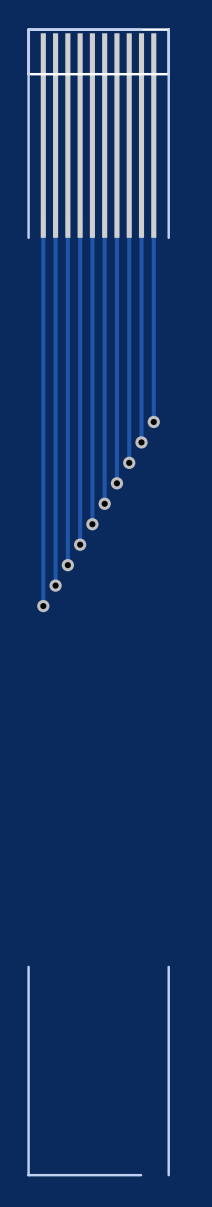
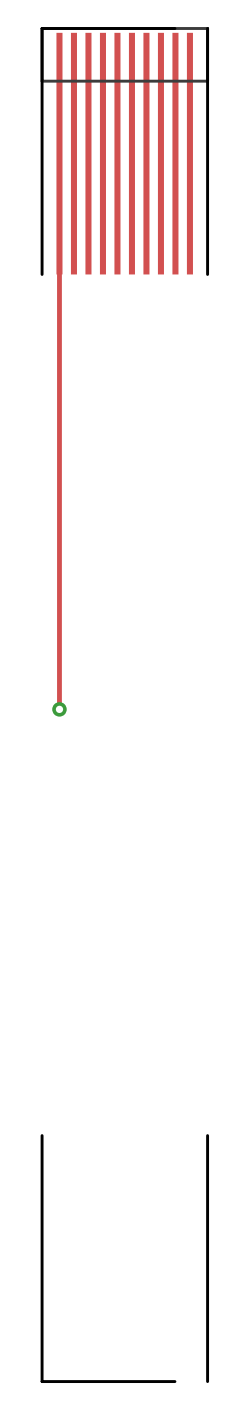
track: (55, 217) (55, 585) -> none
track: (67, 217) (67, 565) -> none
track: (80, 217) (80, 544) -> none
track: (92, 217) (92, 524) -> none
track: (104, 217) (104, 503) -> none
track: (116, 217) (116, 483) -> none
track: (129, 217) (129, 462) -> none
track: (141, 217) (141, 442) -> none
track: (153, 217) (153, 421) -> none
via: (153, 421) -> none
via: (141, 442) -> none
via: (129, 462) -> none
via: (116, 483) -> none
via: (104, 503) -> none
via: (92, 524) -> none
via: (80, 544) -> none
via: (67, 565) -> none
via: (55, 585) -> none

